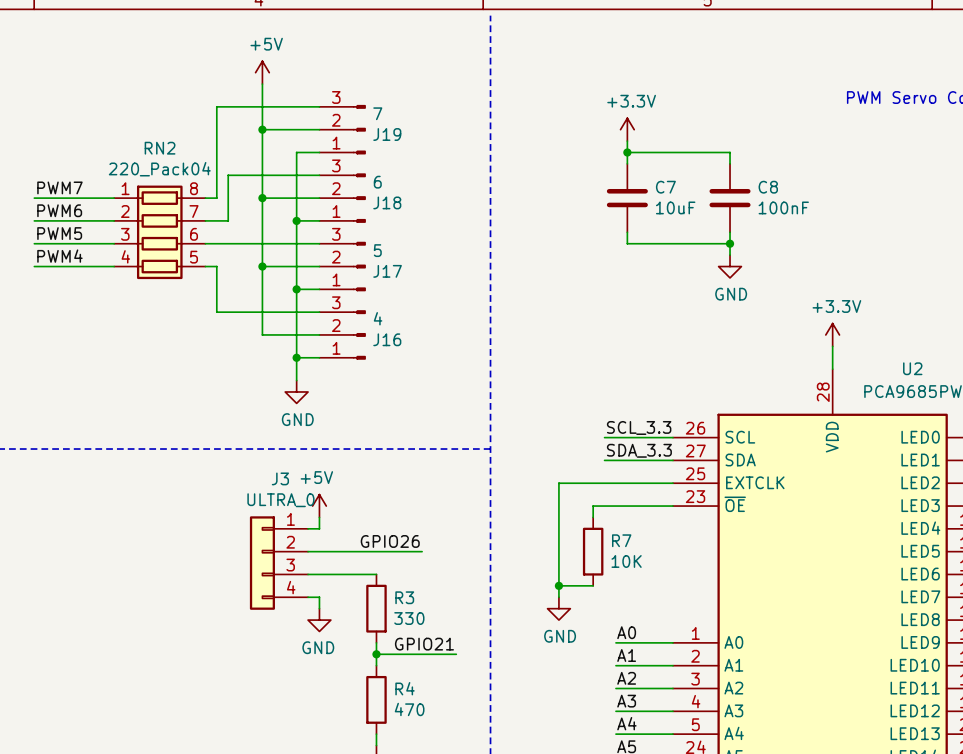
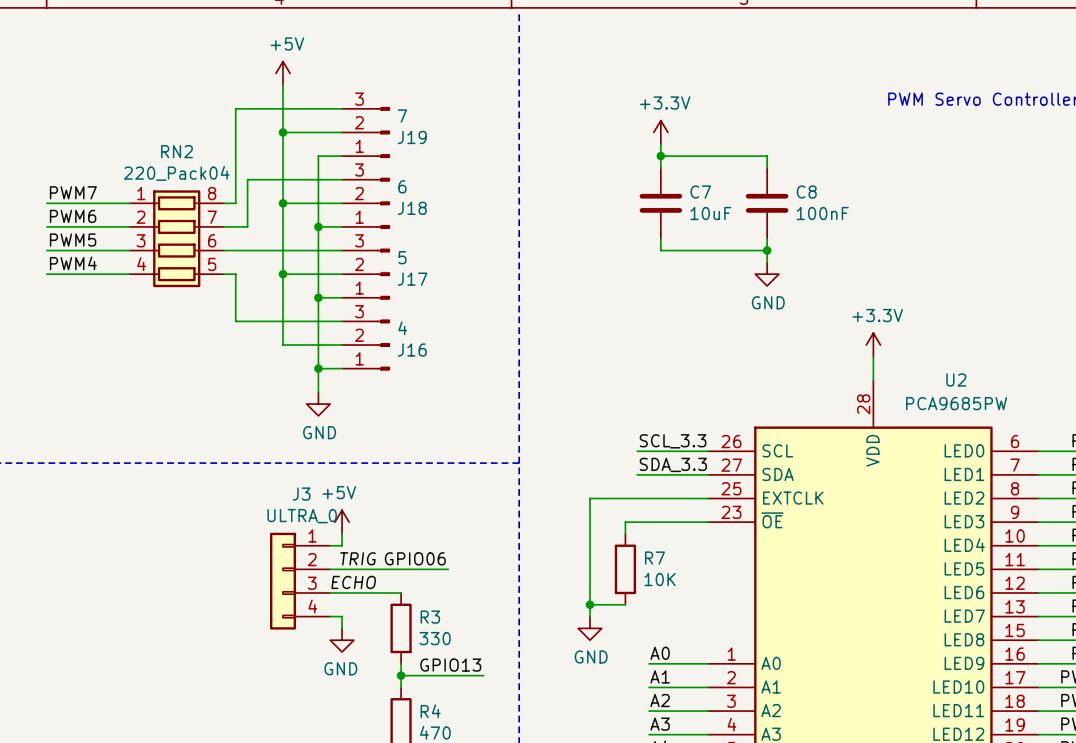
label: none -> TRIG (358, 558)
label: GPIO26 (390, 541) -> GPIO06 (415, 558)
label: none -> ECHO (353, 582)
label: GPIO21 (424, 644) -> GPIO13 (450, 665)

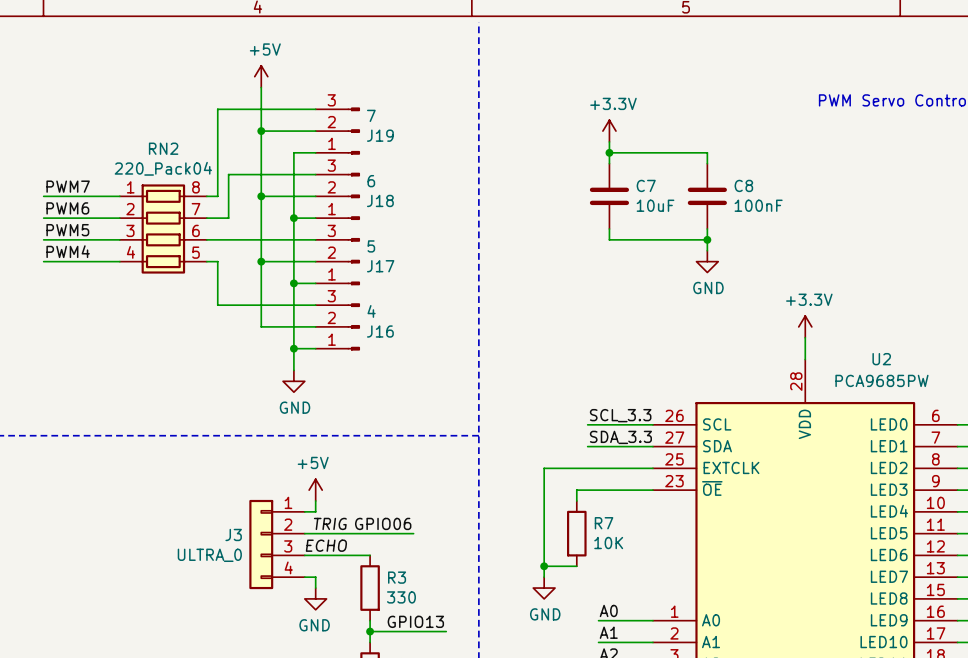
J3 name position: J3 (301, 494) -> J3 (233, 534)
J3 value position: ULTRA_0 (302, 516) -> ULTRA_0 (209, 555)

